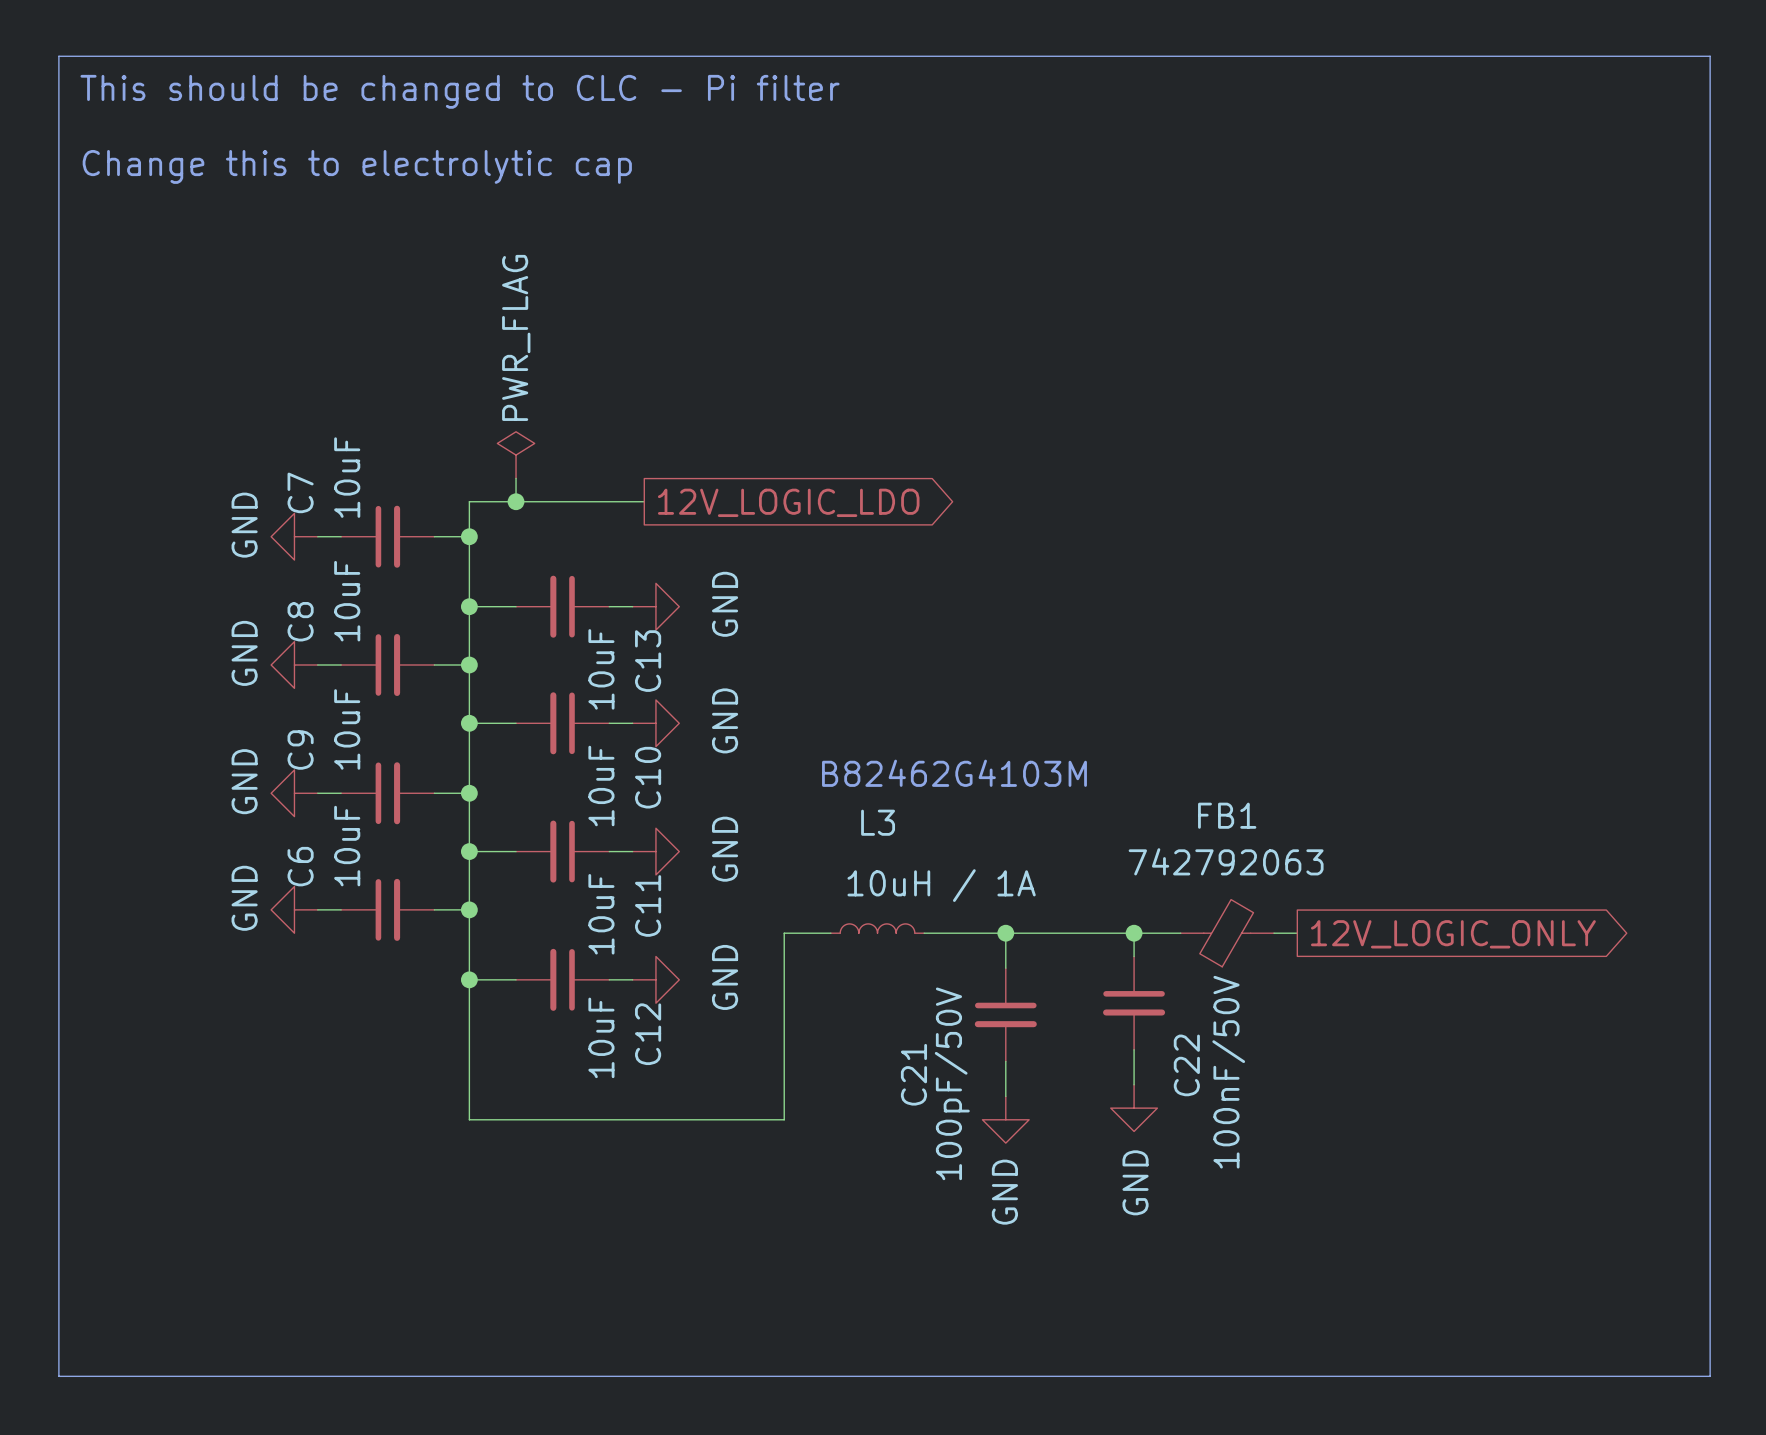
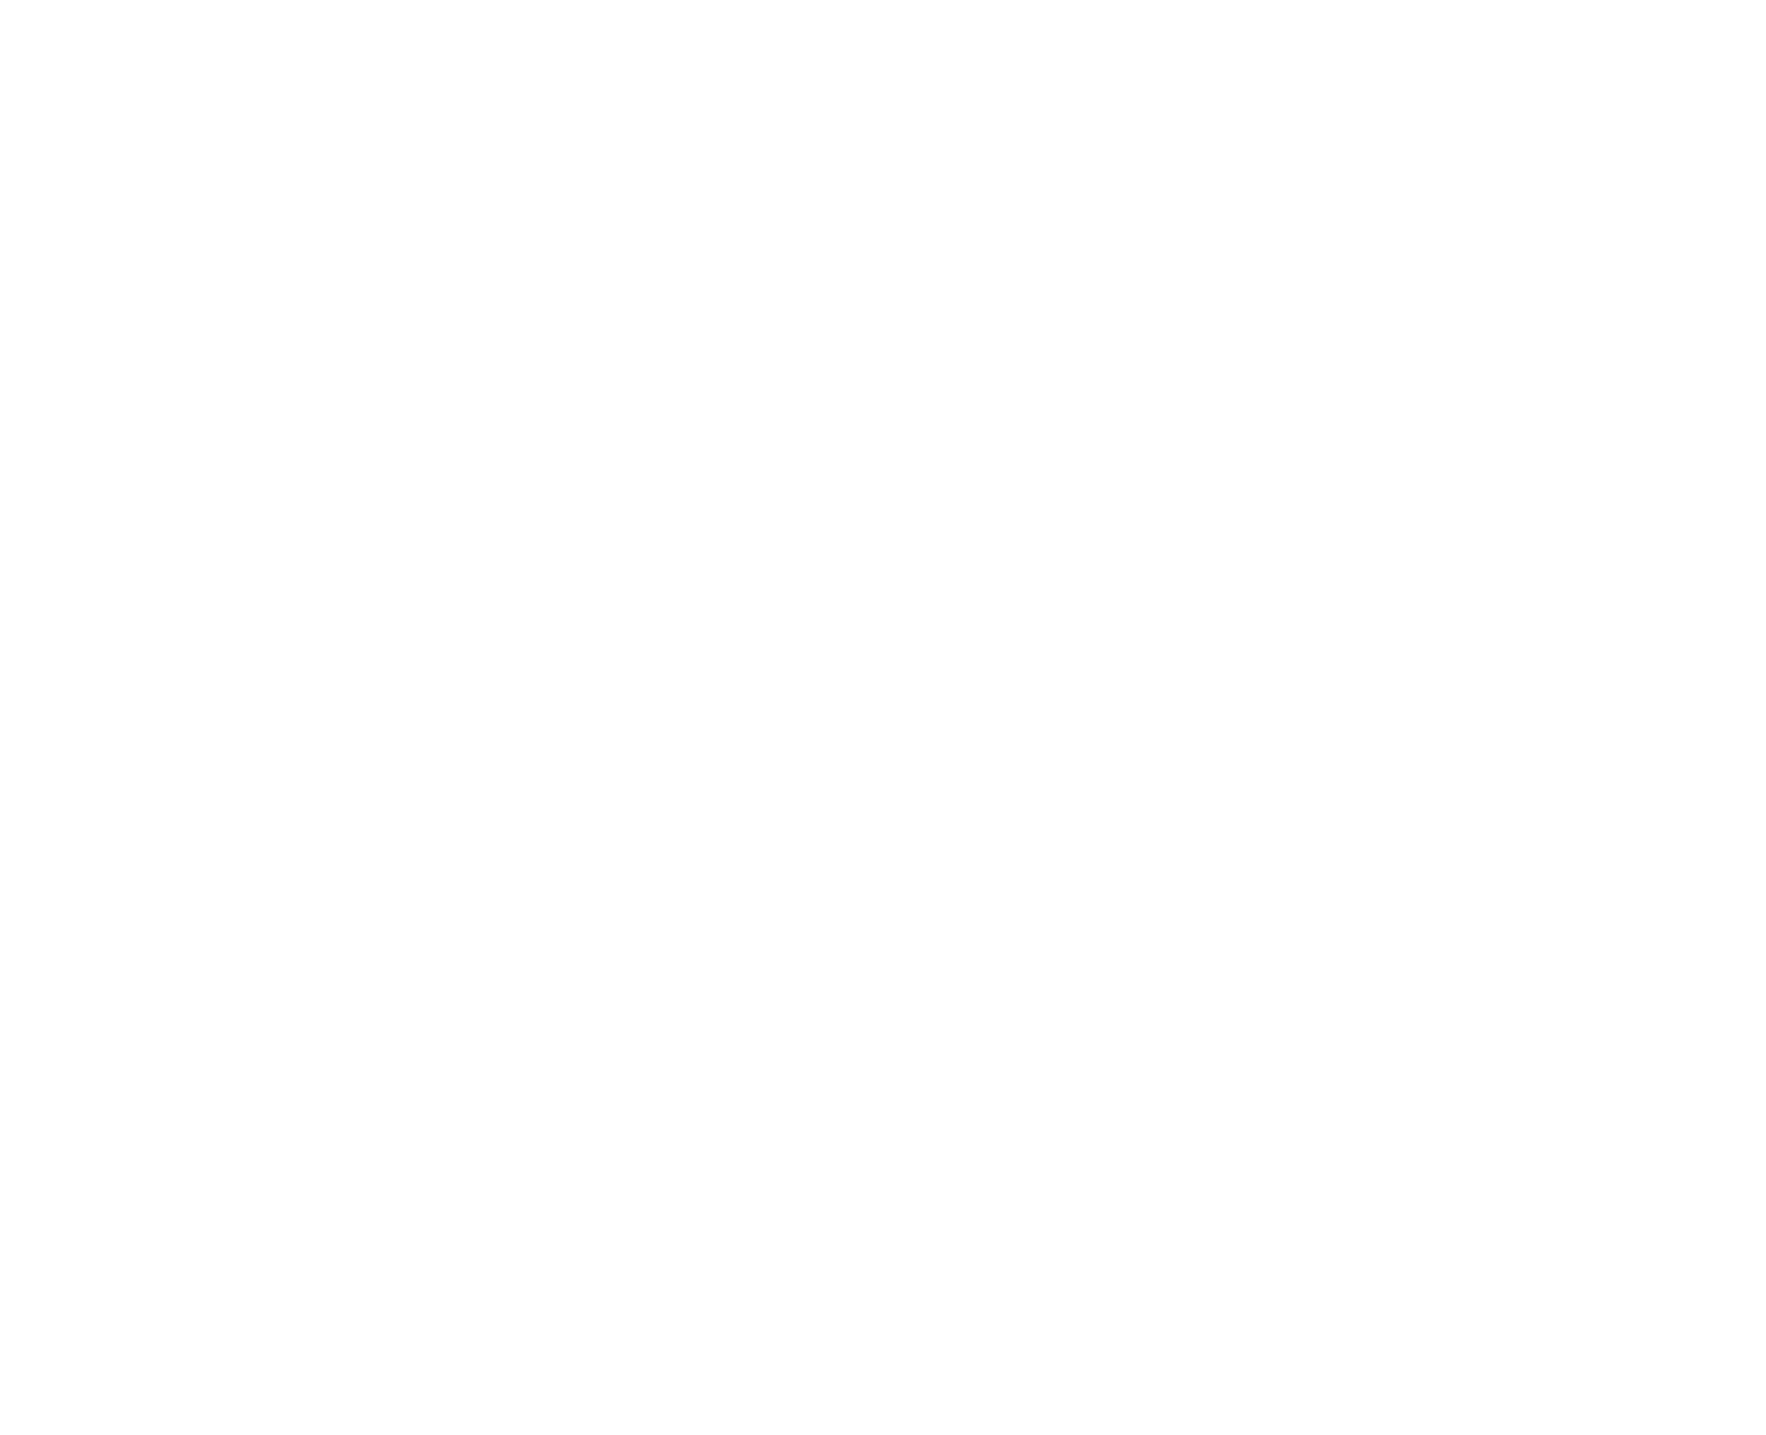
line: (58, 56) (1710, 56) (1710, 1376) (58, 1376) (58, 56) -> none
text: This should be changed to CLC - Pi filter (460, 91) -> none
text: Change this to electrolytic cap (357, 166) -> none
power symbol: PWR_FLAG (516, 455) -> none
wire: (516, 478) (516, 501) -> none
junction: (516, 501) -> none
wire: (644, 501) (469, 501) (469, 1119) (784, 1119) (784, 933) (830, 933) -> none
global label: 12V_LOGIC_LDO (788, 502) -> none
power symbol: GND (294, 536) -> none
wire: (317, 536) (341, 536) -> none
C7: 10uF (387, 536) -> none
wire: (434, 536) (469, 536) -> none
junction: (469, 536) -> none
wire: (469, 606) (516, 606) -> none
junction: (469, 606) -> none
C13: 10uF (562, 606) -> none
wire: (609, 606) (632, 606) -> none
power symbol: GND (655, 606) -> none
power symbol: GND (294, 664) -> none
wire: (317, 664) (341, 664) -> none
C8: 10uF (387, 664) -> none
wire: (434, 664) (469, 664) -> none
junction: (469, 664) -> none
wire: (469, 723) (516, 723) -> none
junction: (469, 723) -> none
C10: 10uF (562, 723) -> none
wire: (609, 723) (632, 723) -> none
power symbol: GND (655, 723) -> none
text: B82462G4103M (954, 773) -> none
power symbol: GND (294, 793) -> none
wire: (317, 793) (341, 793) -> none
C9: 10uF (387, 793) -> none
wire: (434, 793) (469, 793) -> none
junction: (469, 793) -> none
wire: (469, 851) (516, 851) -> none
junction: (469, 851) -> none
C11: 10uF (562, 851) -> none
wire: (609, 851) (632, 851) -> none
power symbol: GND (655, 851) -> none
power symbol: GND (294, 909) -> none
wire: (317, 909) (341, 909) -> none
C6: 10uF (387, 909) -> none
wire: (434, 909) (469, 909) -> none
junction: (469, 909) -> none
L3: 10uH / 1A (877, 928) -> none
wire: (924, 933) (1180, 933) -> none
wire: (1005, 933) (1005, 968) -> none
junction: (1005, 933) -> none
wire: (1134, 933) (1134, 956) -> none
junction: (1134, 933) -> none
FB1: 742792063 (1227, 933) -> none
wire: (1274, 933) (1297, 933) -> none
global label: 12V_LOGIC_ONLY (1453, 934) -> none
wire: (469, 979) (516, 979) -> none
junction: (469, 979) -> none
C12: 10uF (562, 979) -> none
wire: (609, 979) (632, 979) -> none
power symbol: GND (655, 979) -> none
C22: 100nF/50V (1134, 1003) -> none
C21: 100pF/50V (1005, 1014) -> none
wire: (1134, 1049) (1134, 1084) -> none
wire: (1005, 1061) (1005, 1096) -> none
power symbol: GND (1134, 1108) -> none
power symbol: GND (1005, 1119) -> none

